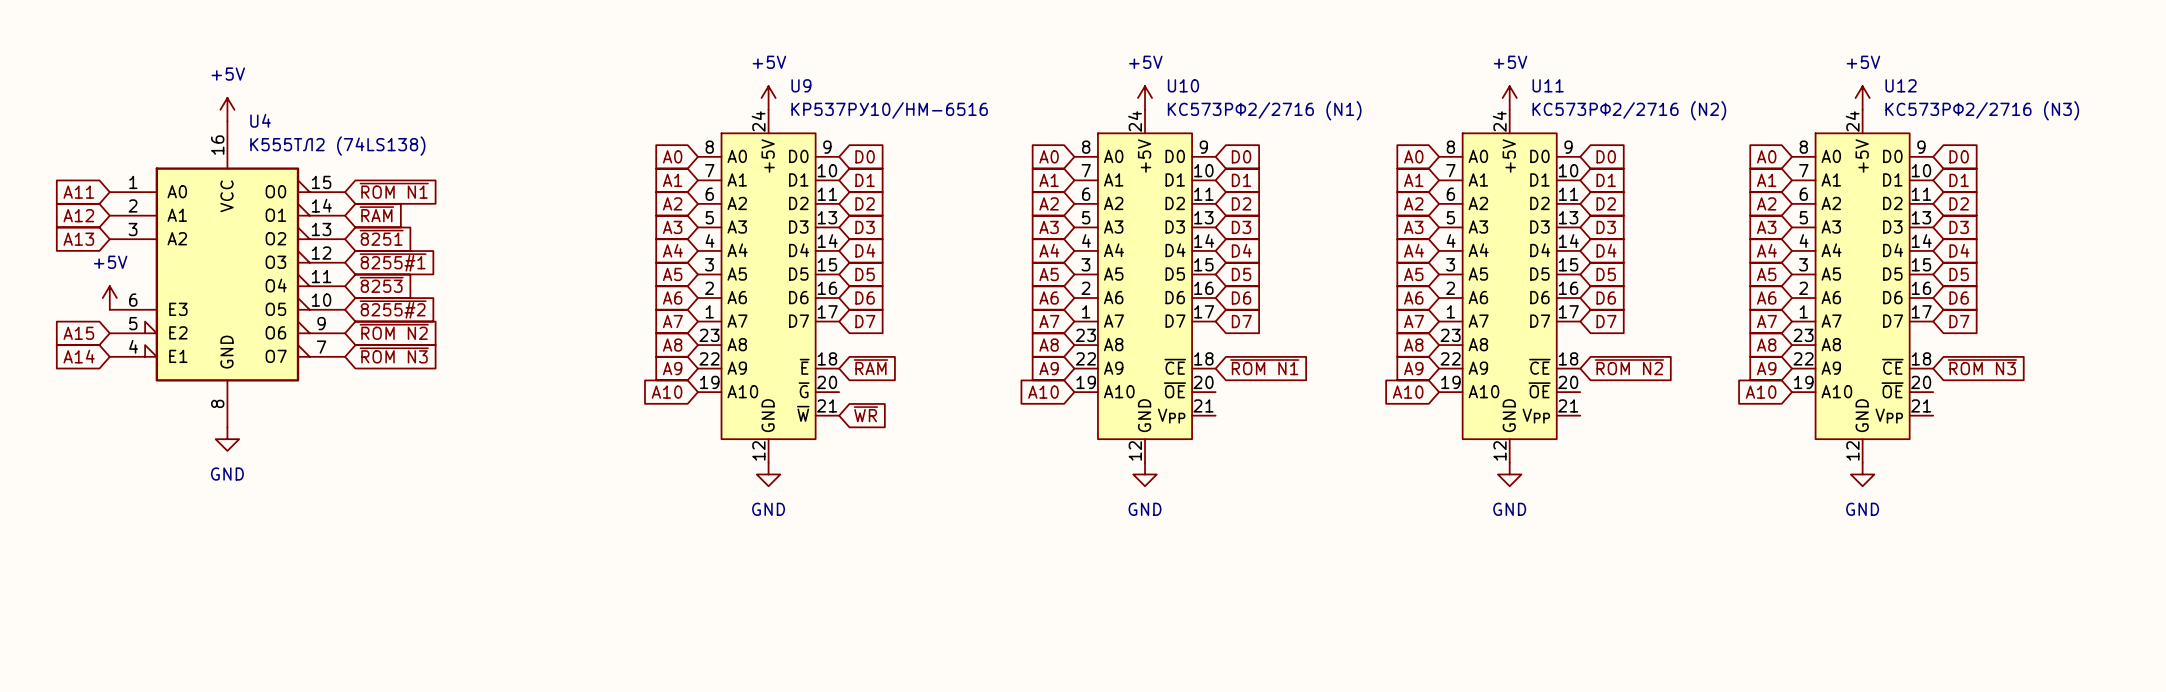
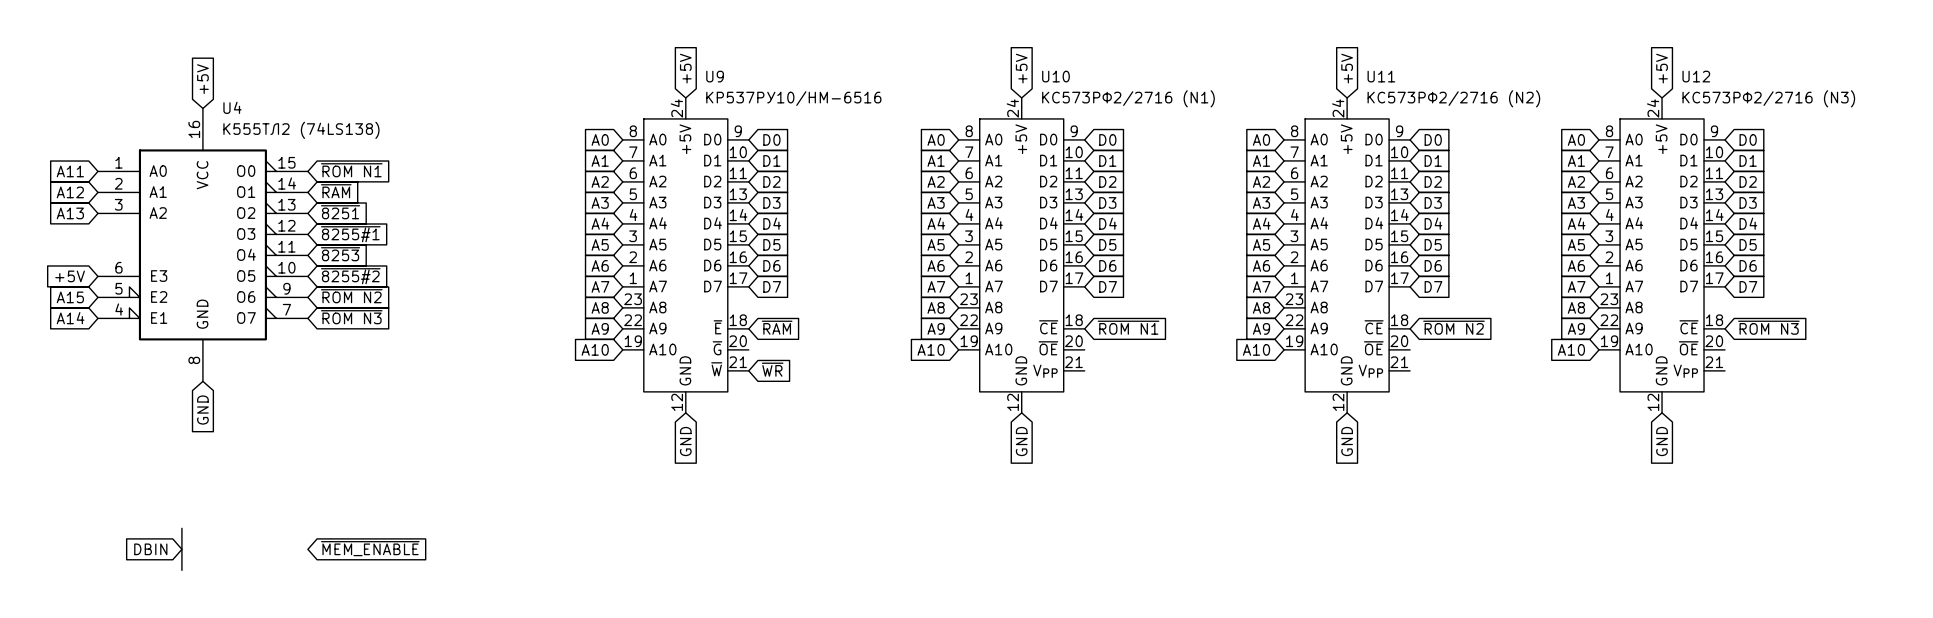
global label: none -> +5V (685, 68)
global label: none -> +5V (1021, 68)
global label: none -> +5V (1347, 68)
global label: none -> +5V (1662, 68)
global label: none -> +5V (202, 79)
power symbol: +5V (768, 98) -> none
power symbol: +5V (1145, 98) -> none
power symbol: +5V (1509, 98) -> none
power symbol: +5V (1862, 98) -> none
power symbol: +5V (227, 109) -> none
power symbol: +5V (109, 298) -> none
global label: none -> +5V (70, 276)
power symbol: GND (227, 439) -> none
global label: none -> GND (202, 410)
power symbol: GND (768, 474) -> none
power symbol: GND (1145, 474) -> none
power symbol: GND (1509, 474) -> none
power symbol: GND (1862, 474) -> none
global label: none -> GND (685, 441)
global label: none -> GND (1021, 441)
global label: none -> GND (1347, 441)
global label: none -> GND (1662, 441)
wire: none -> (181, 528) (181, 570)
global label: none -> ~{MEM_ENABLE} (370, 548)
global label: none -> DBIN (150, 549)

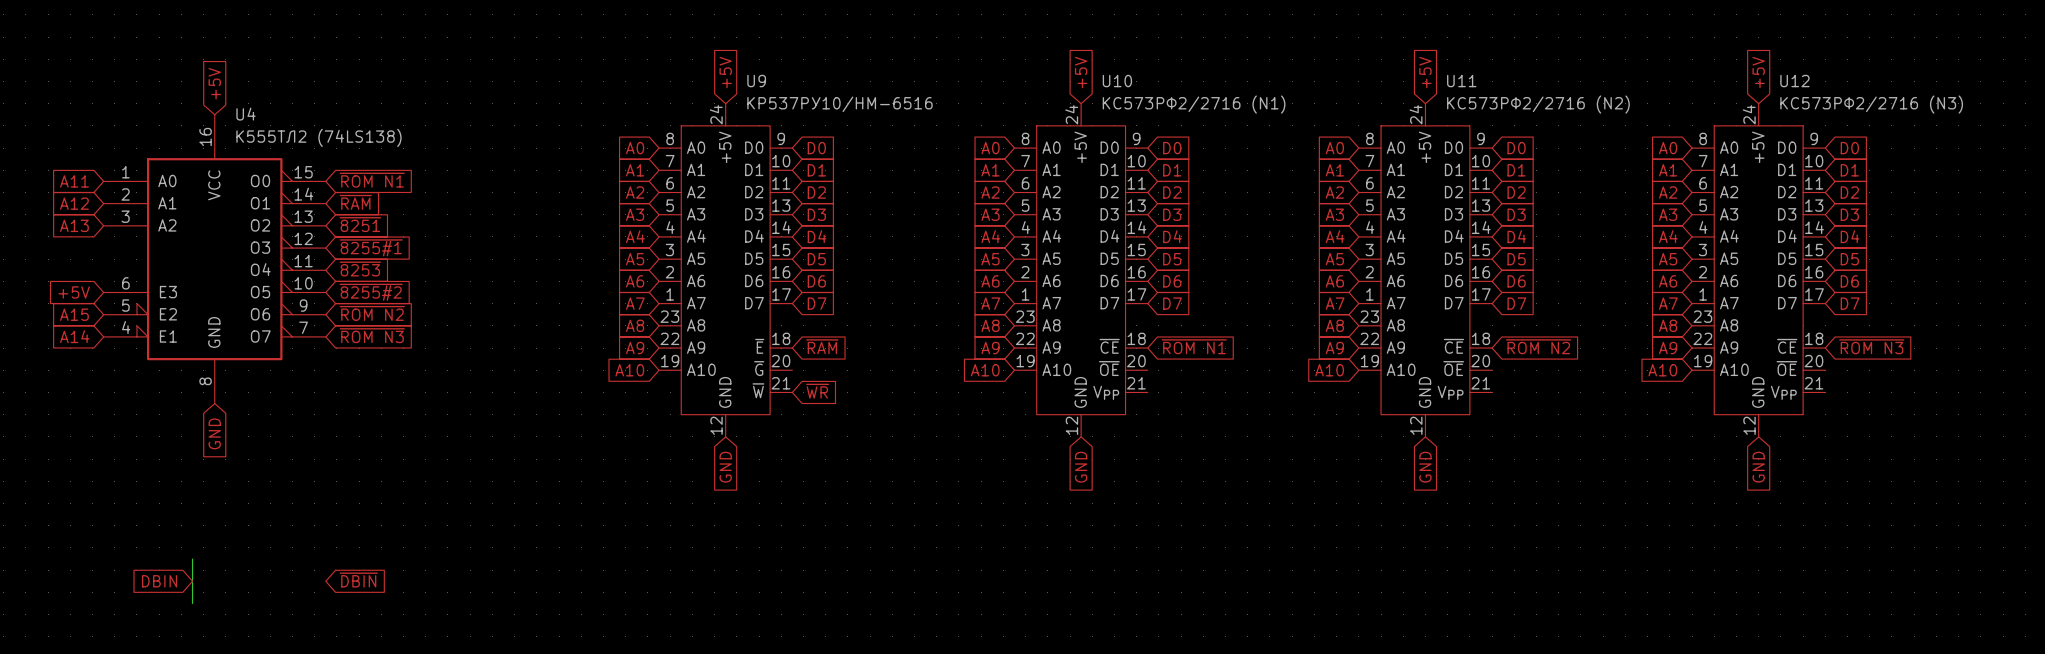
global label: ~{MEM_ENABLE} (370, 548) -> ~{DBIN} (358, 580)

